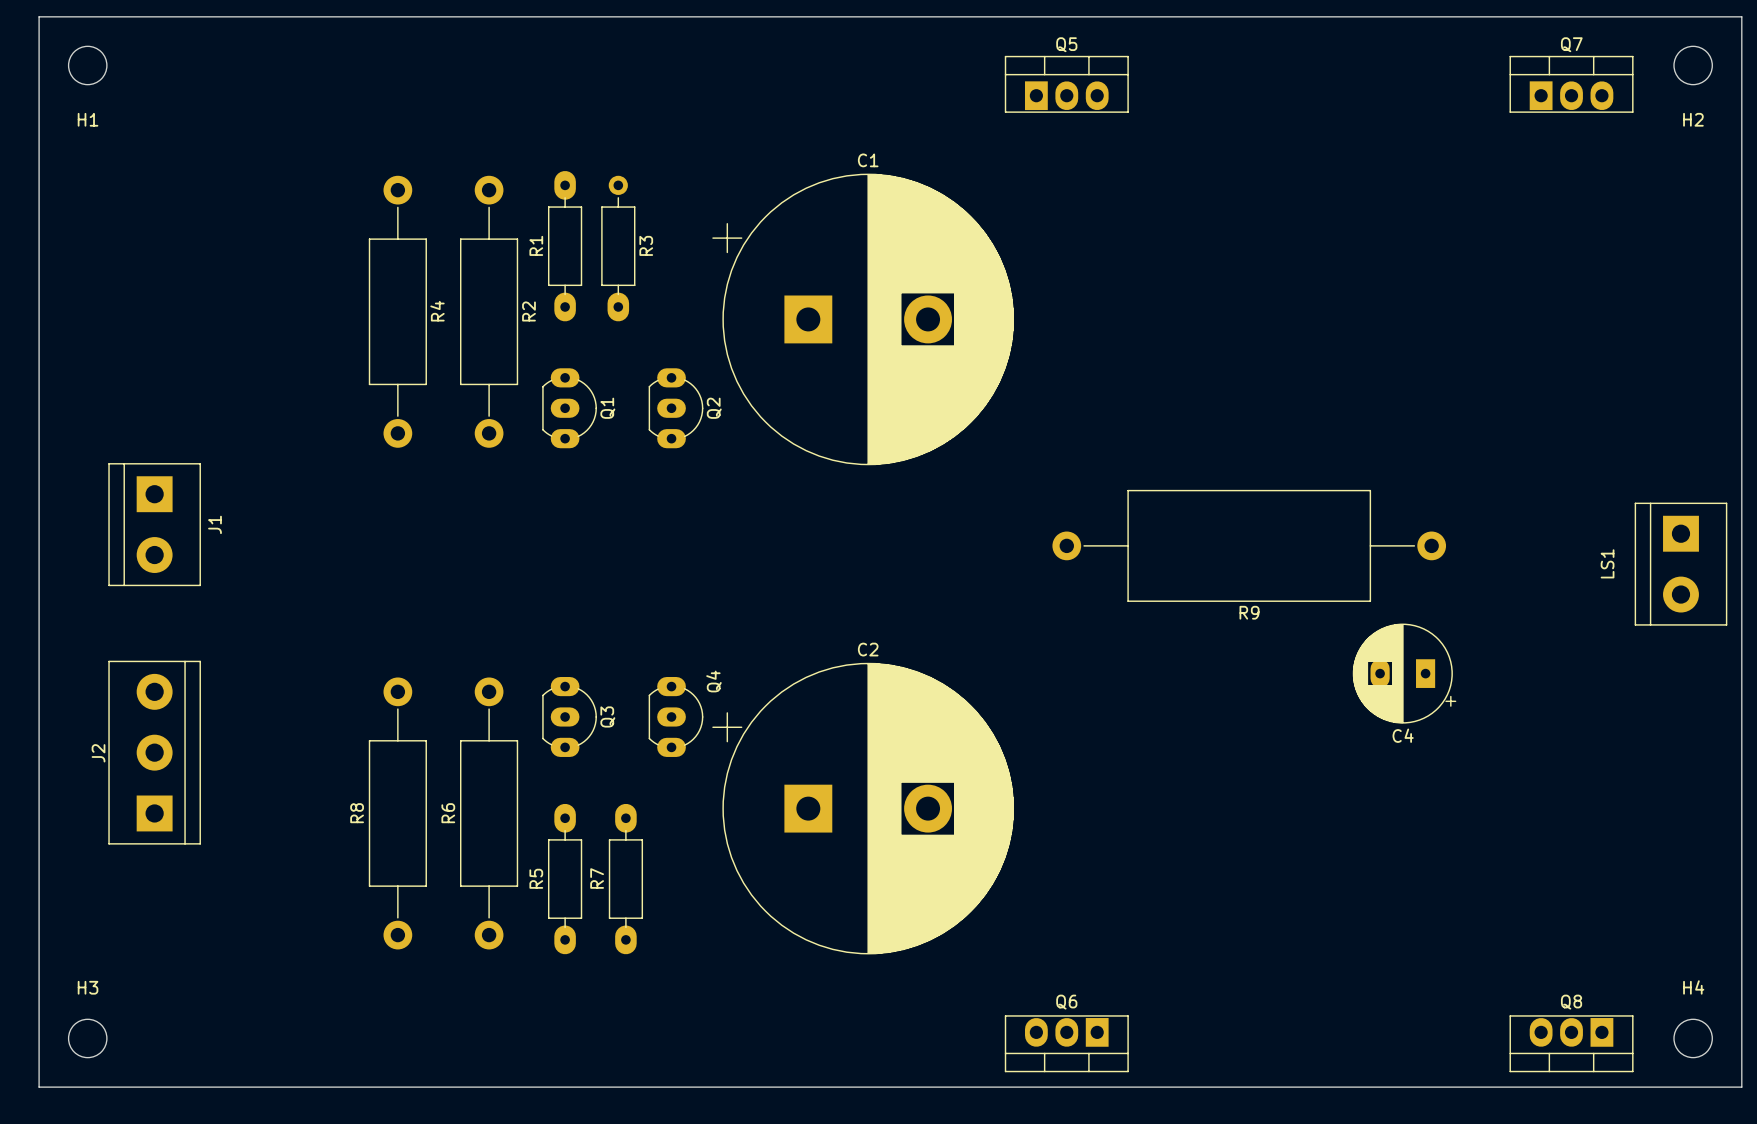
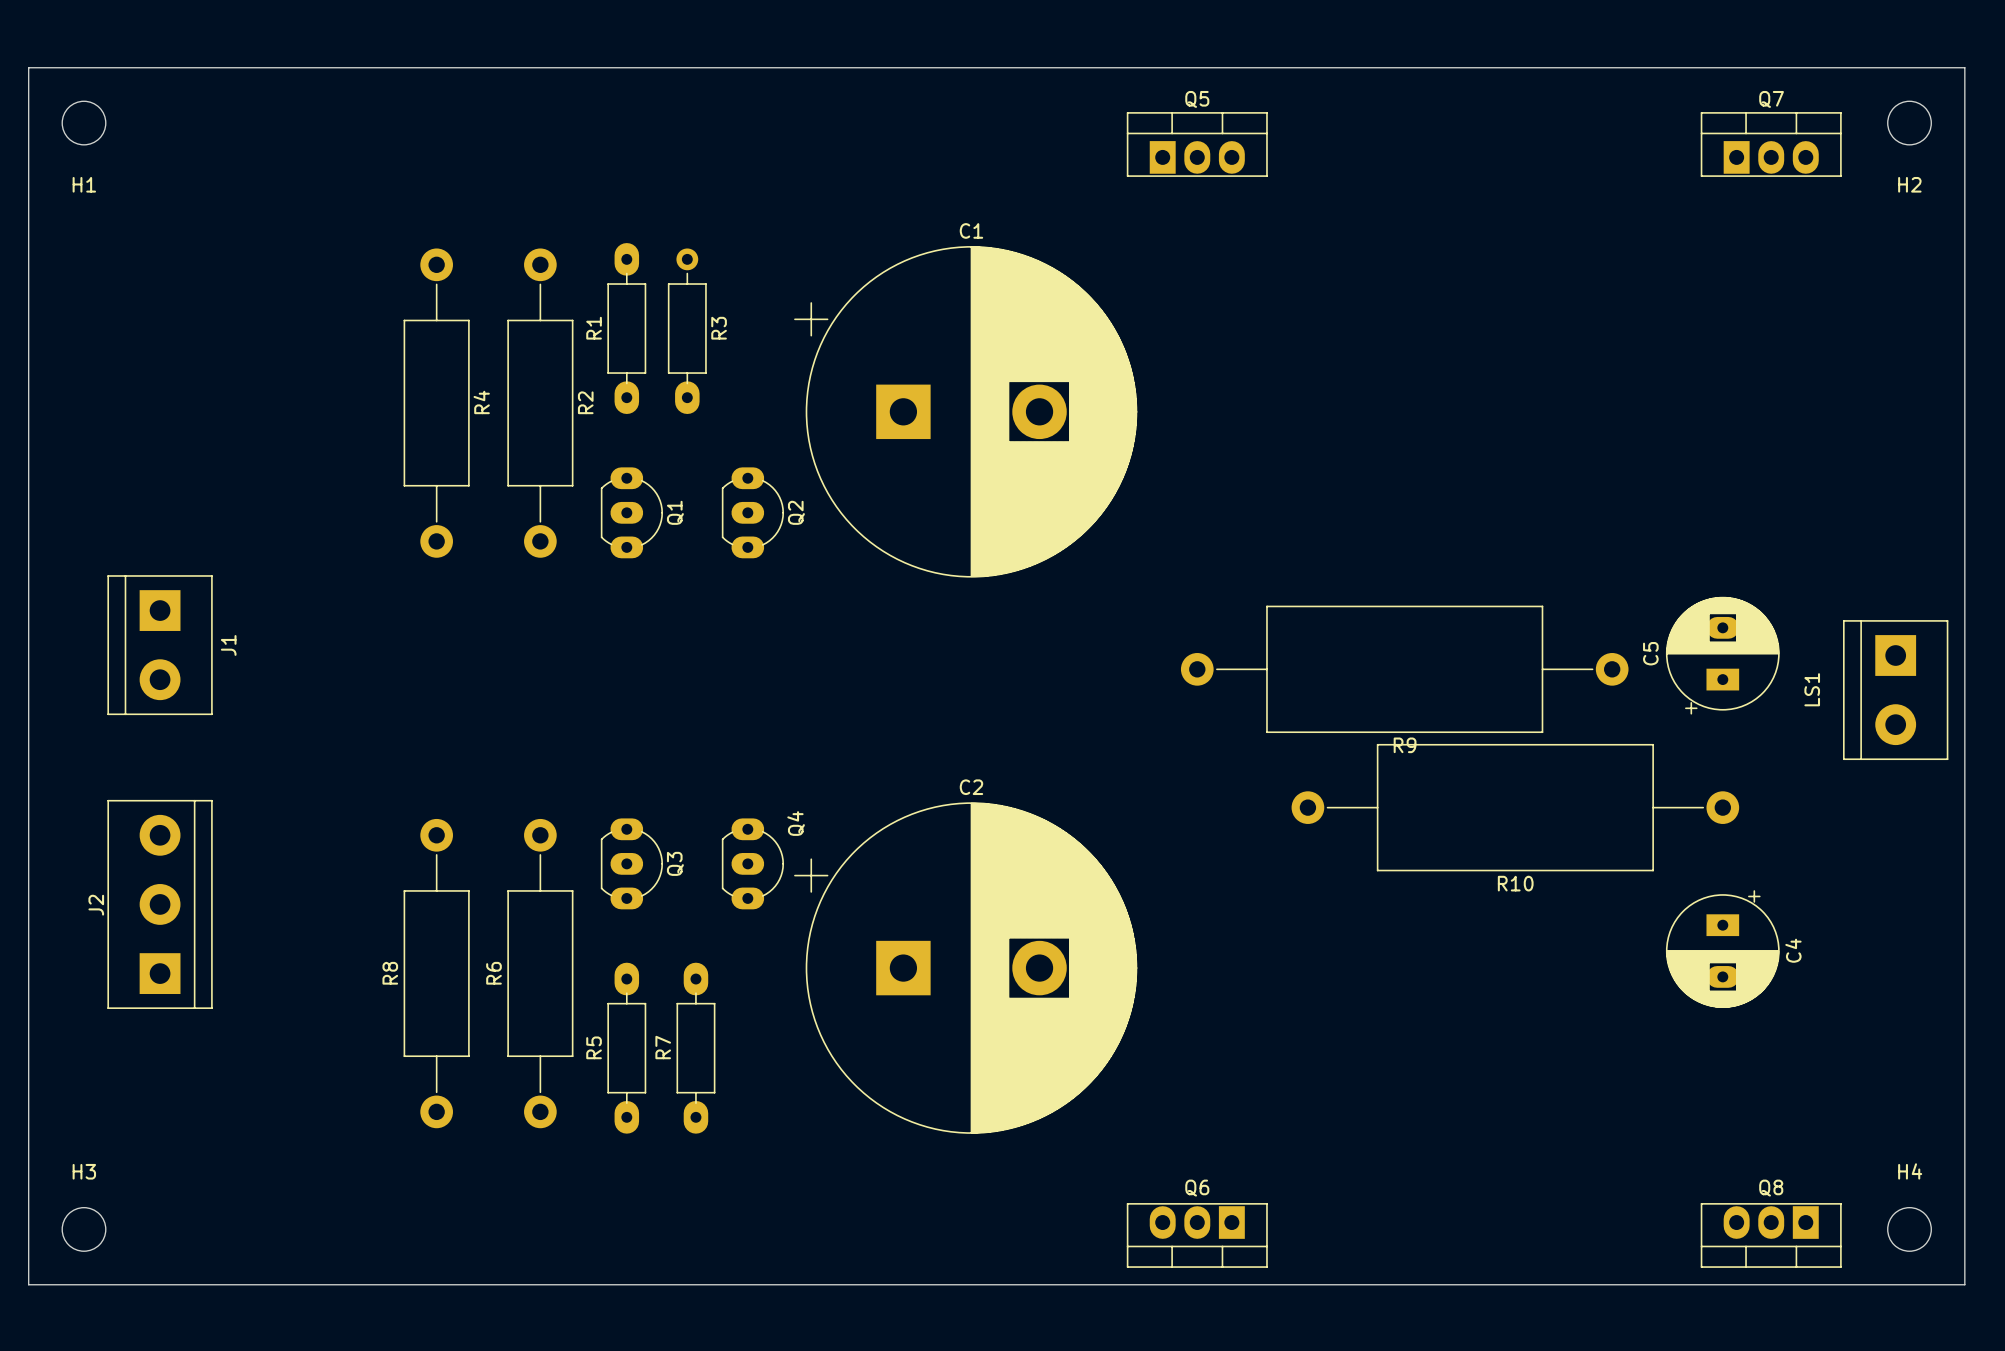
C5: none -> (1722, 655)
R10: none -> (1515, 807)
C4 rotation: 0° (1404, 673) -> 90° counterclockwise (1722, 949)
C4 position: (1404, 673) -> (1722, 949)

